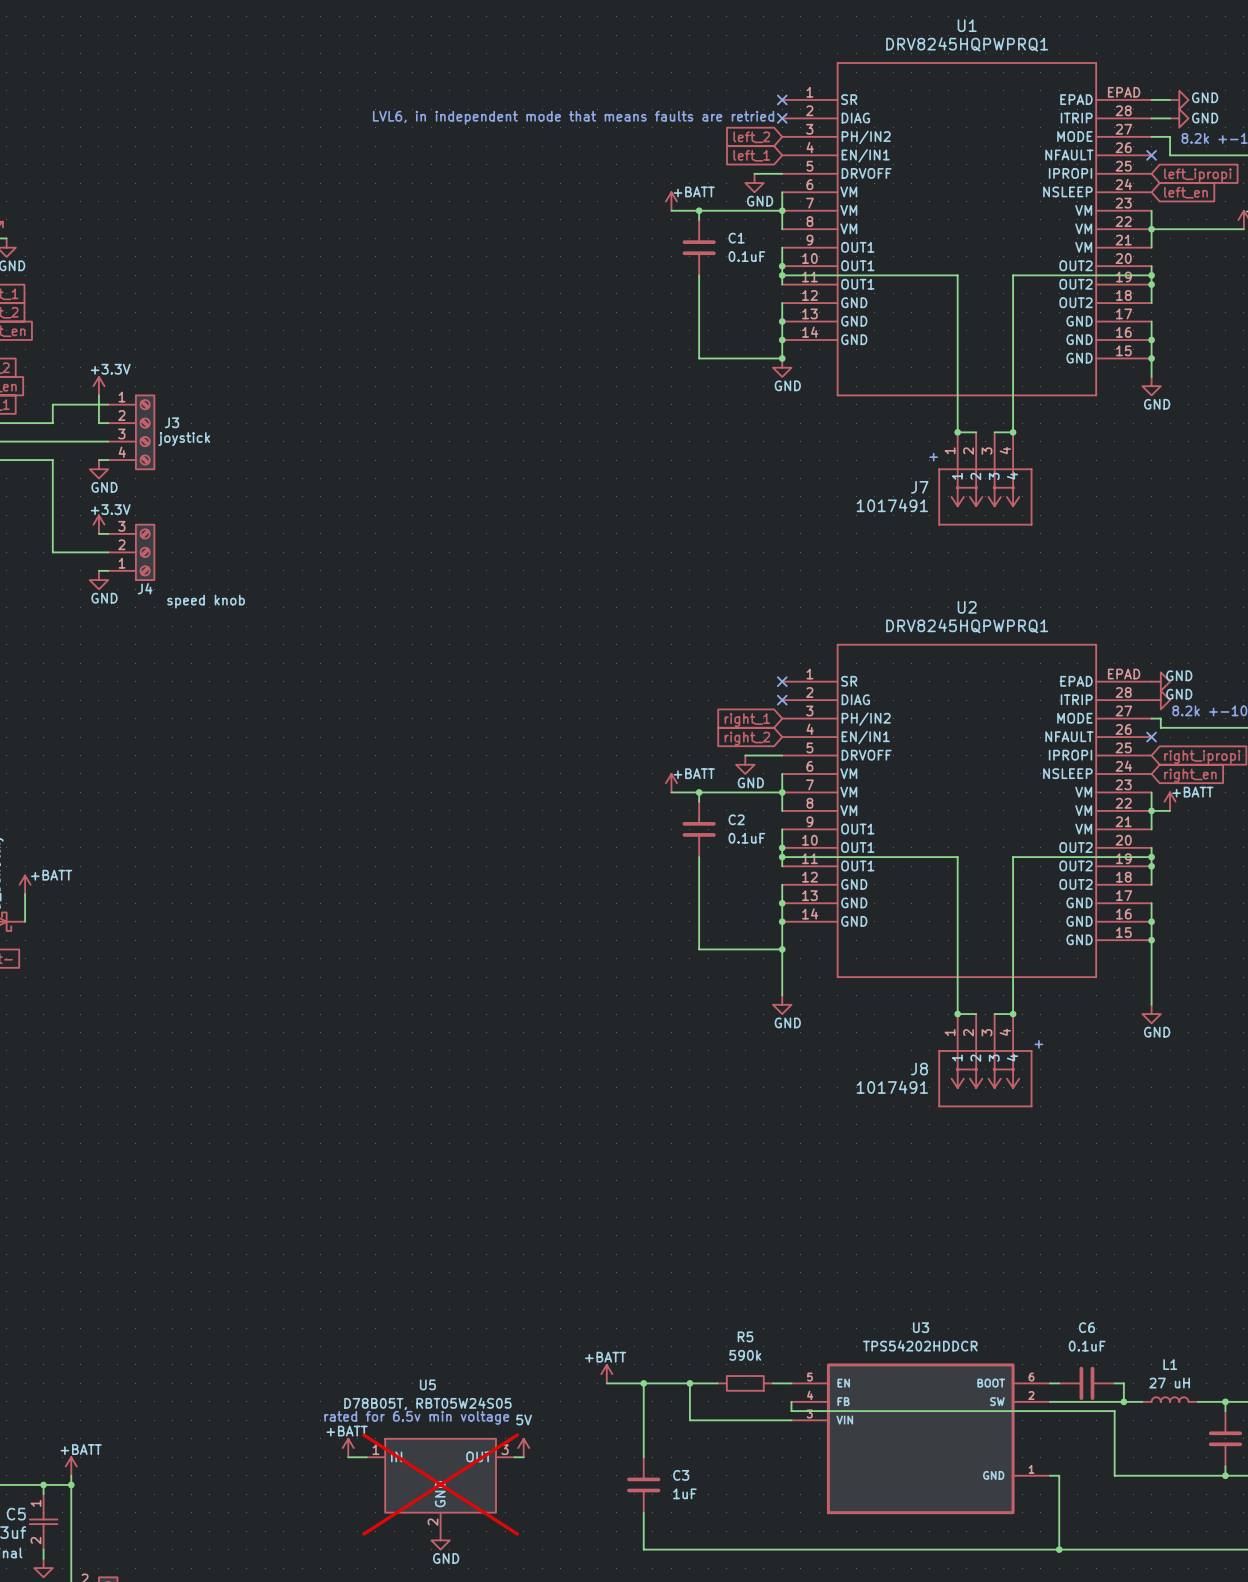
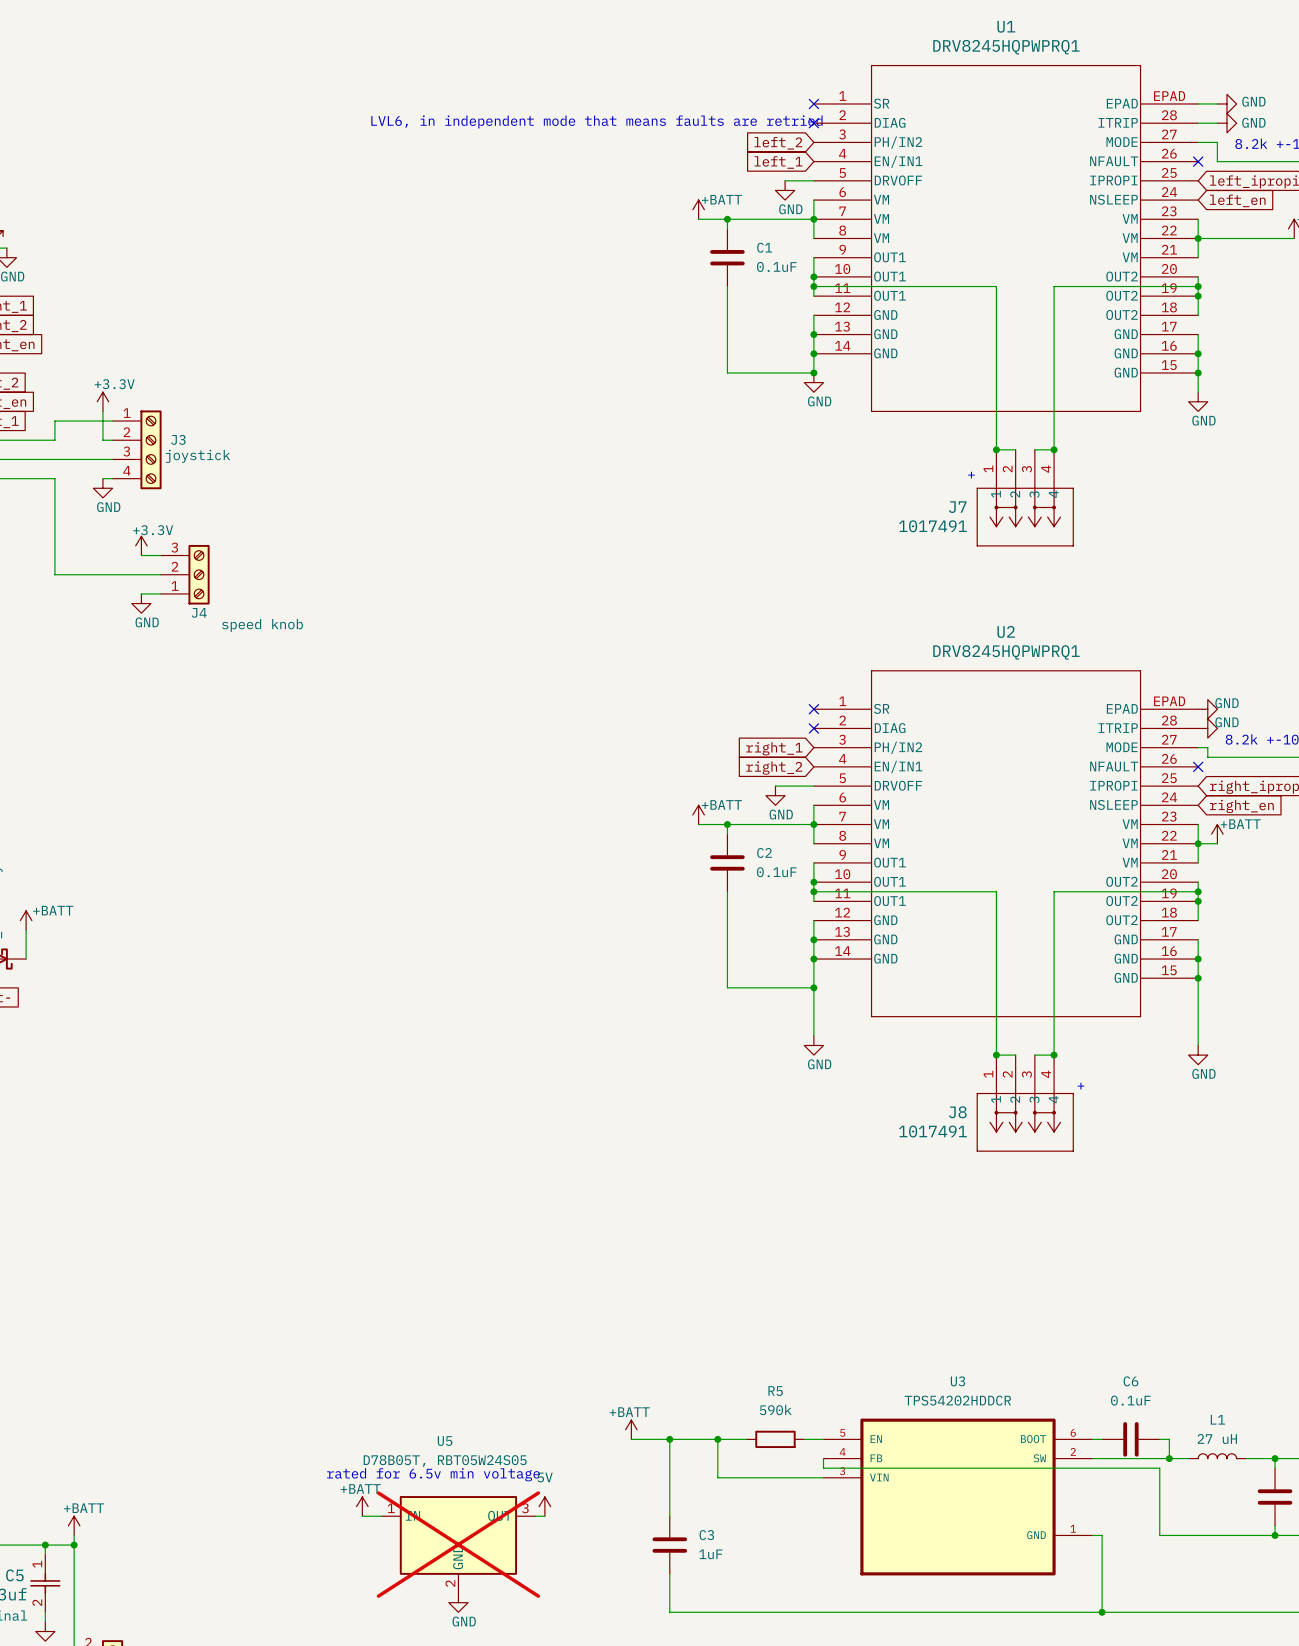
power symbol position: +3.3V (98, 524) -> +3.3V (141, 545)
wire: (98, 533) (108, 533) -> none
J4 position: (131, 552) -> (185, 574)
wire: (98, 570) (108, 570) -> none
power symbol position: GND (98, 580) -> GND (141, 603)

